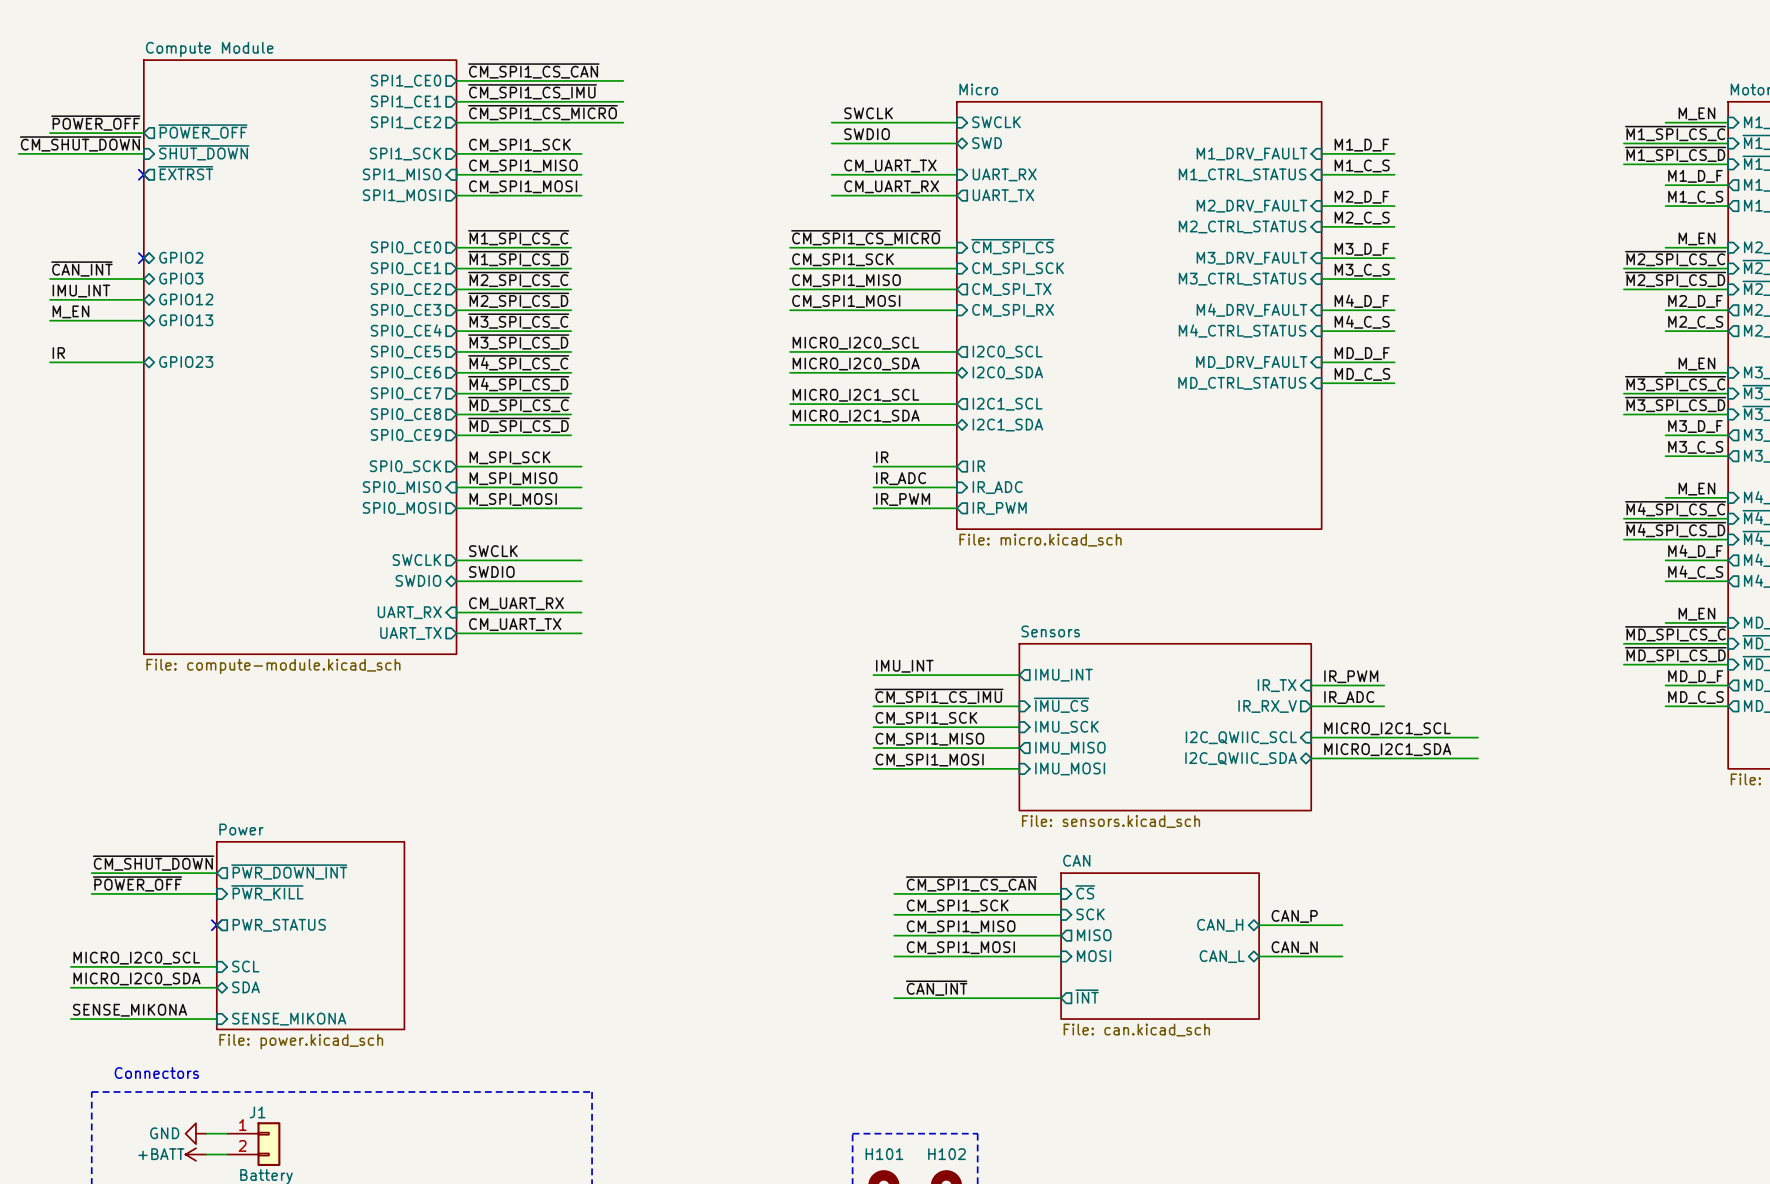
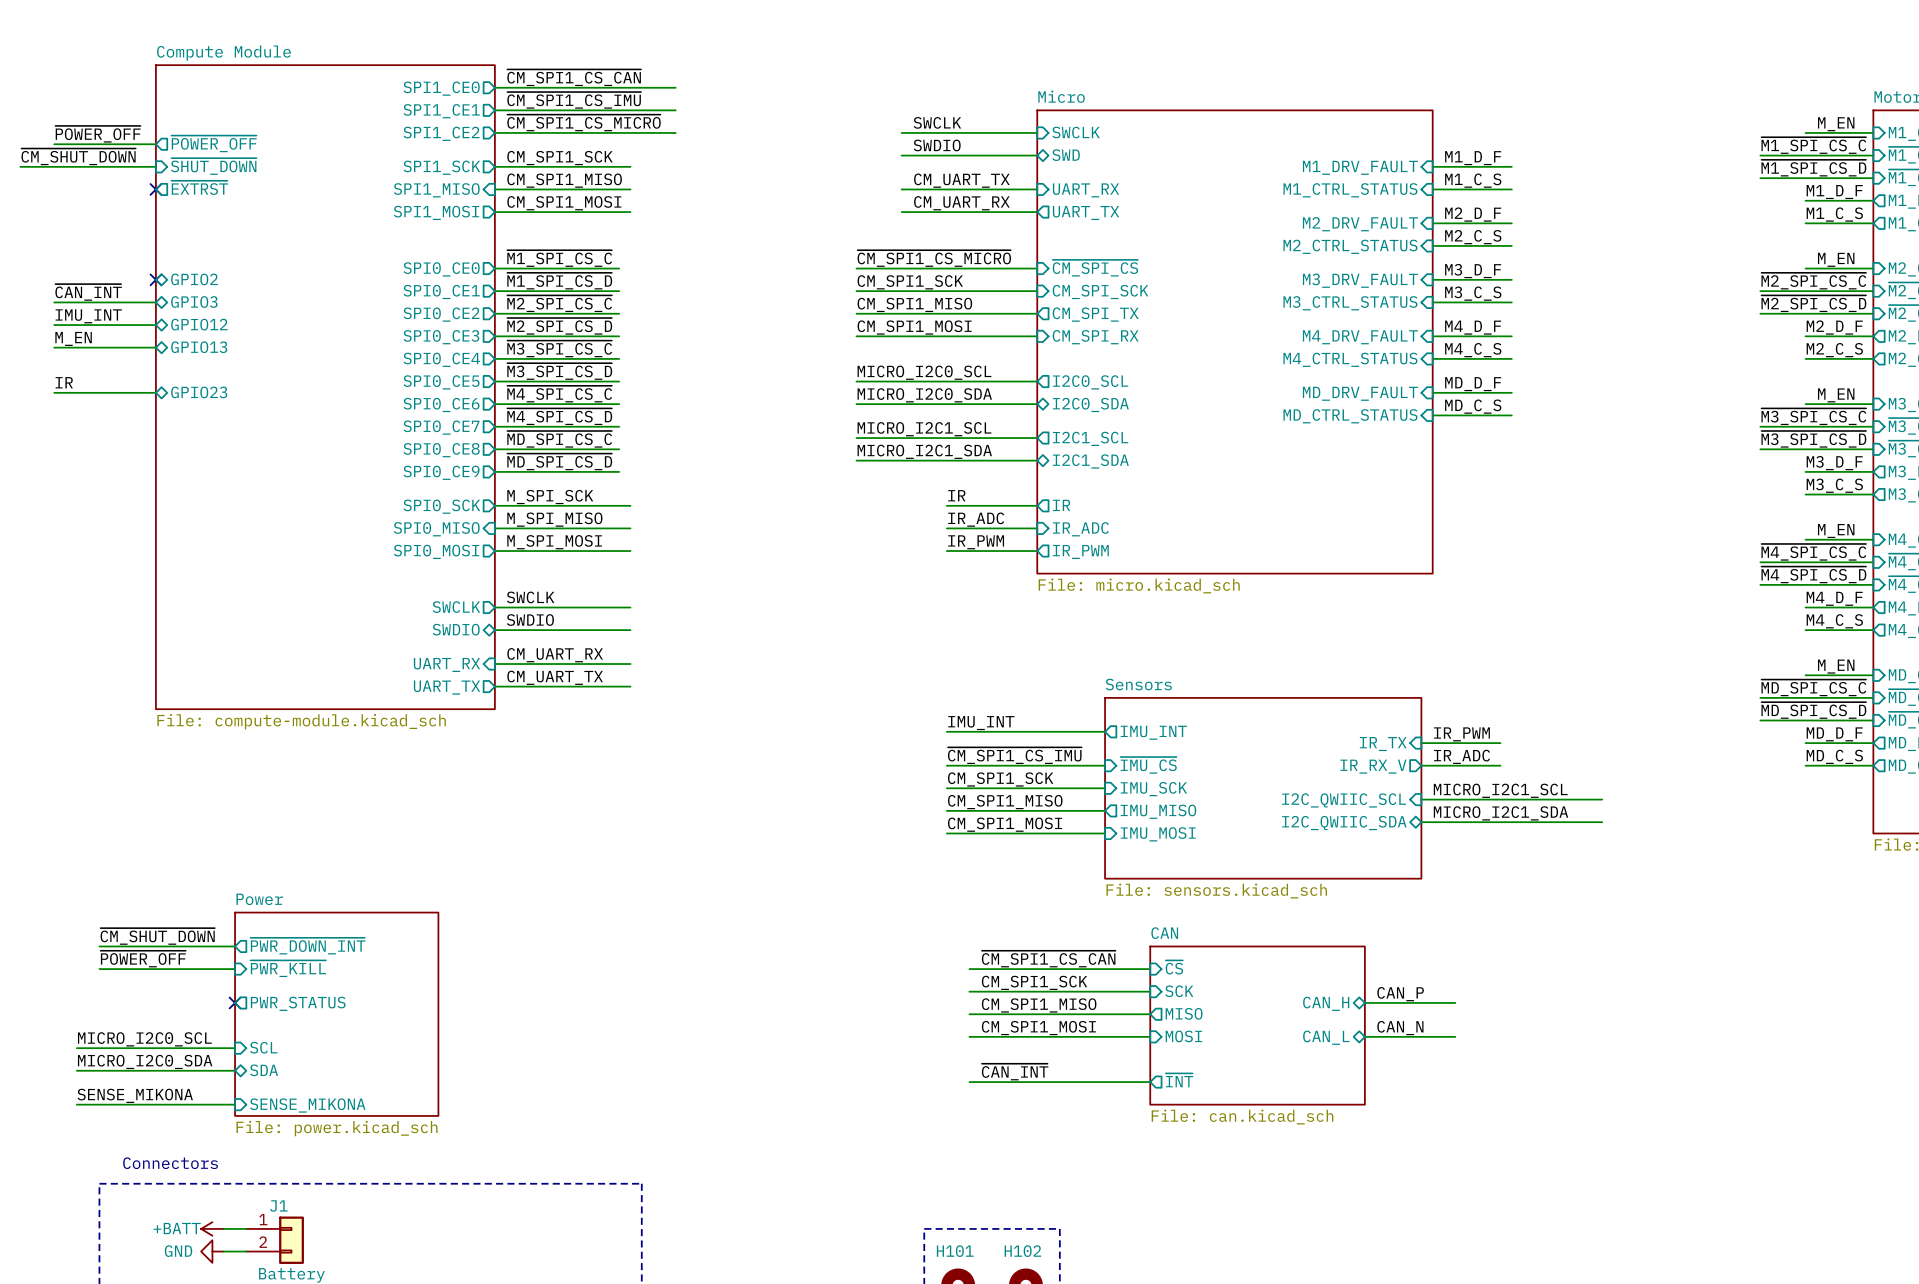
power symbol: GND (195, 1133) -> +BATT (212, 1228)
power symbol: +BATT (195, 1154) -> GND (212, 1251)

